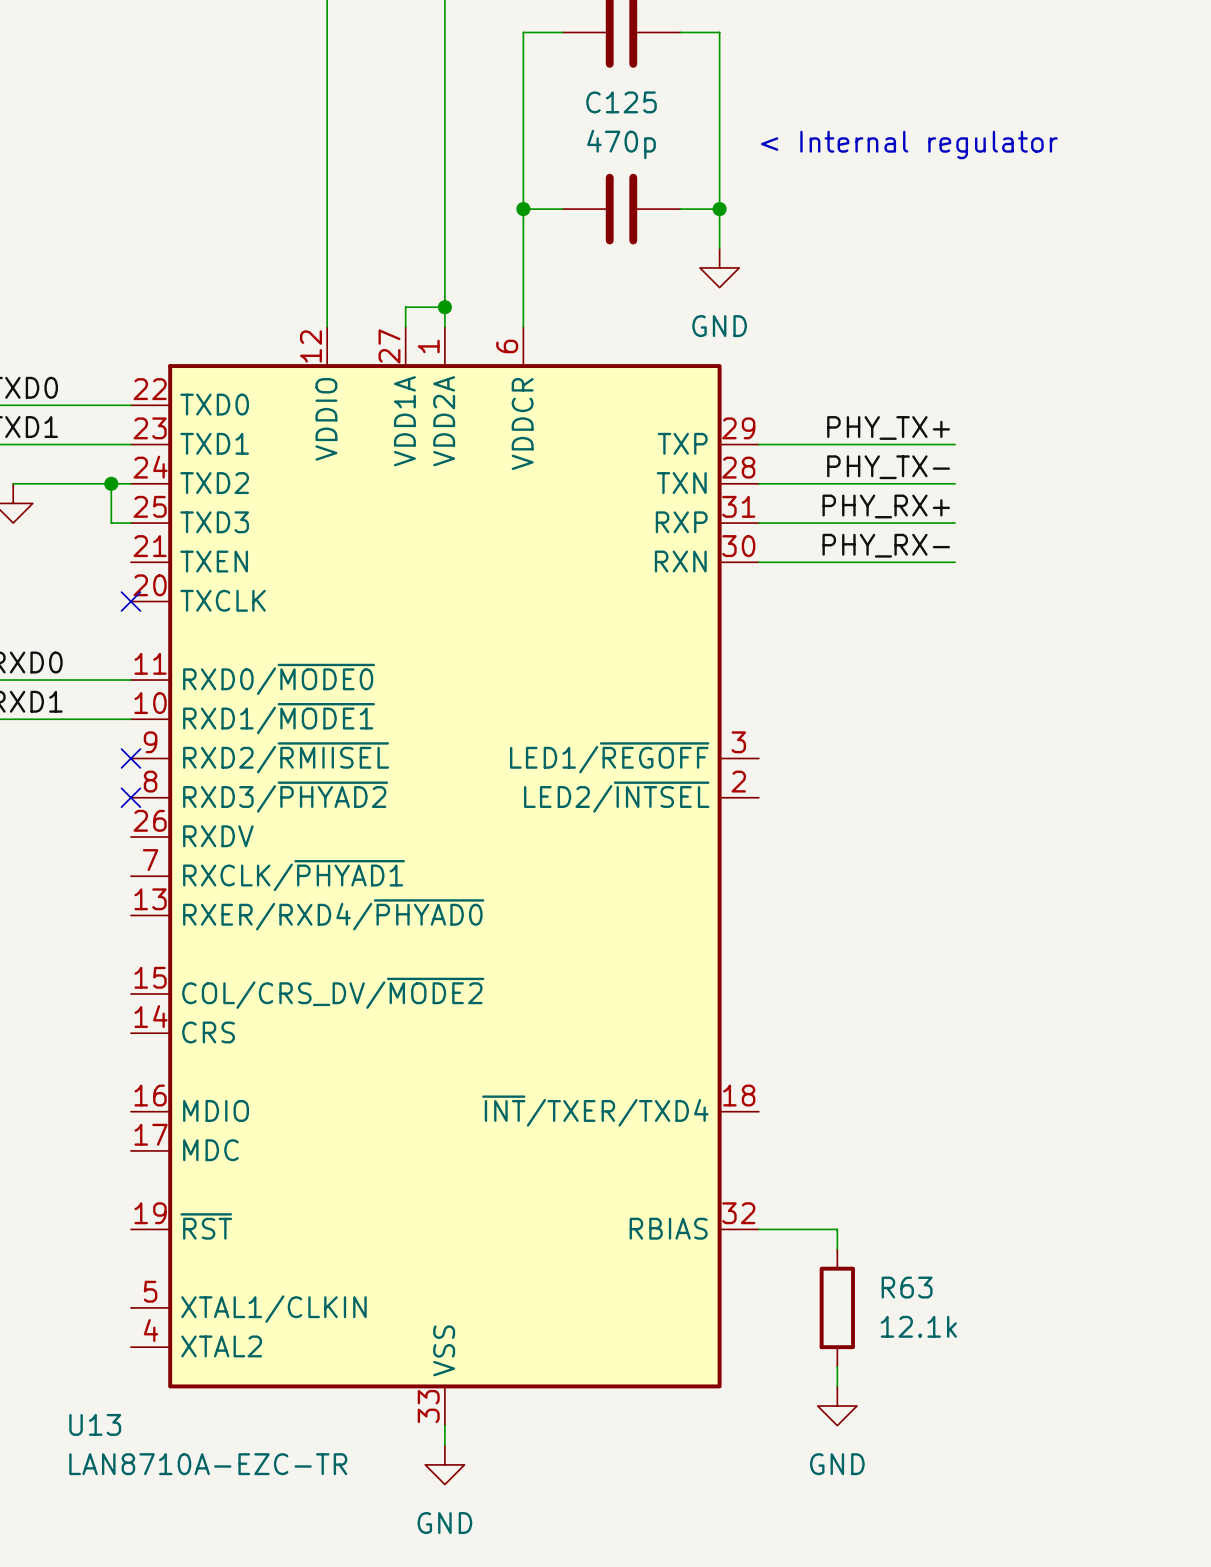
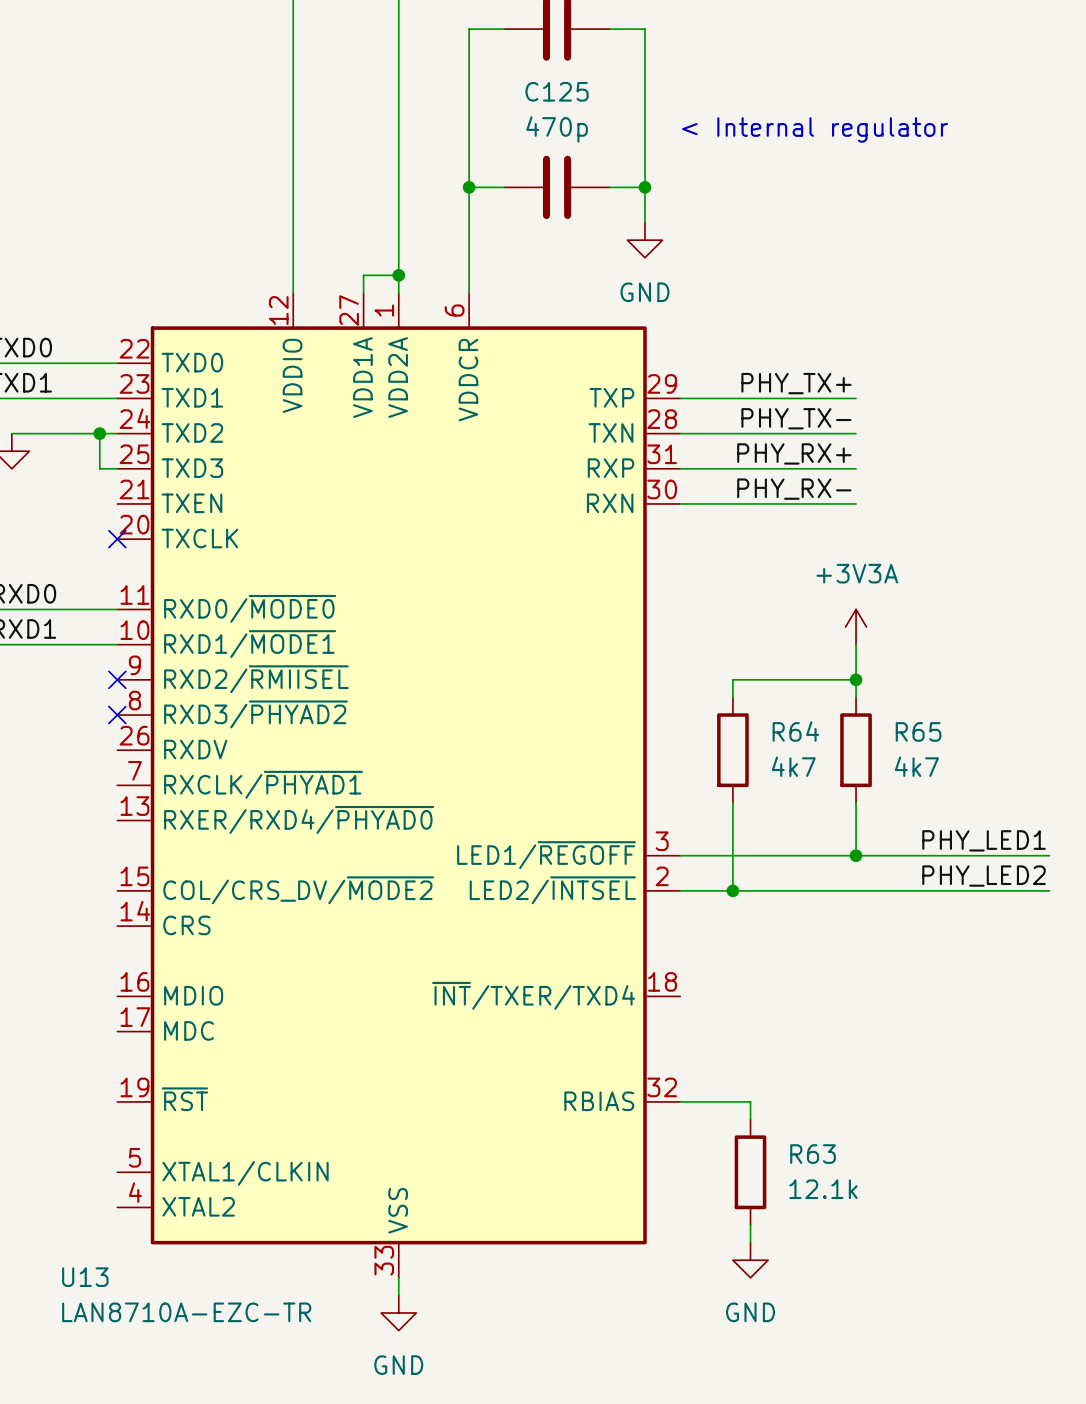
U13 symbol: [130, 326, 759, 1426] -> [117, 292, 681, 1278]
power symbol: none -> +3V3A (856, 627)
wire: none -> (856, 644) (856, 697)
wire: none -> (856, 679) (732, 679) (732, 697)
junction: none -> (856, 679)
R64: none -> 4k7 (732, 750)
R65: none -> 4k7 (856, 750)
wire: none -> (732, 802) (732, 890)
wire: none -> (856, 802) (856, 855)
label: none -> PHY_LED1 (984, 840)
wire: none -> (680, 855) (1049, 855)
junction: none -> (856, 855)
label: none -> PHY_LED2 (984, 876)
wire: none -> (680, 890) (1049, 890)
junction: none -> (732, 890)

